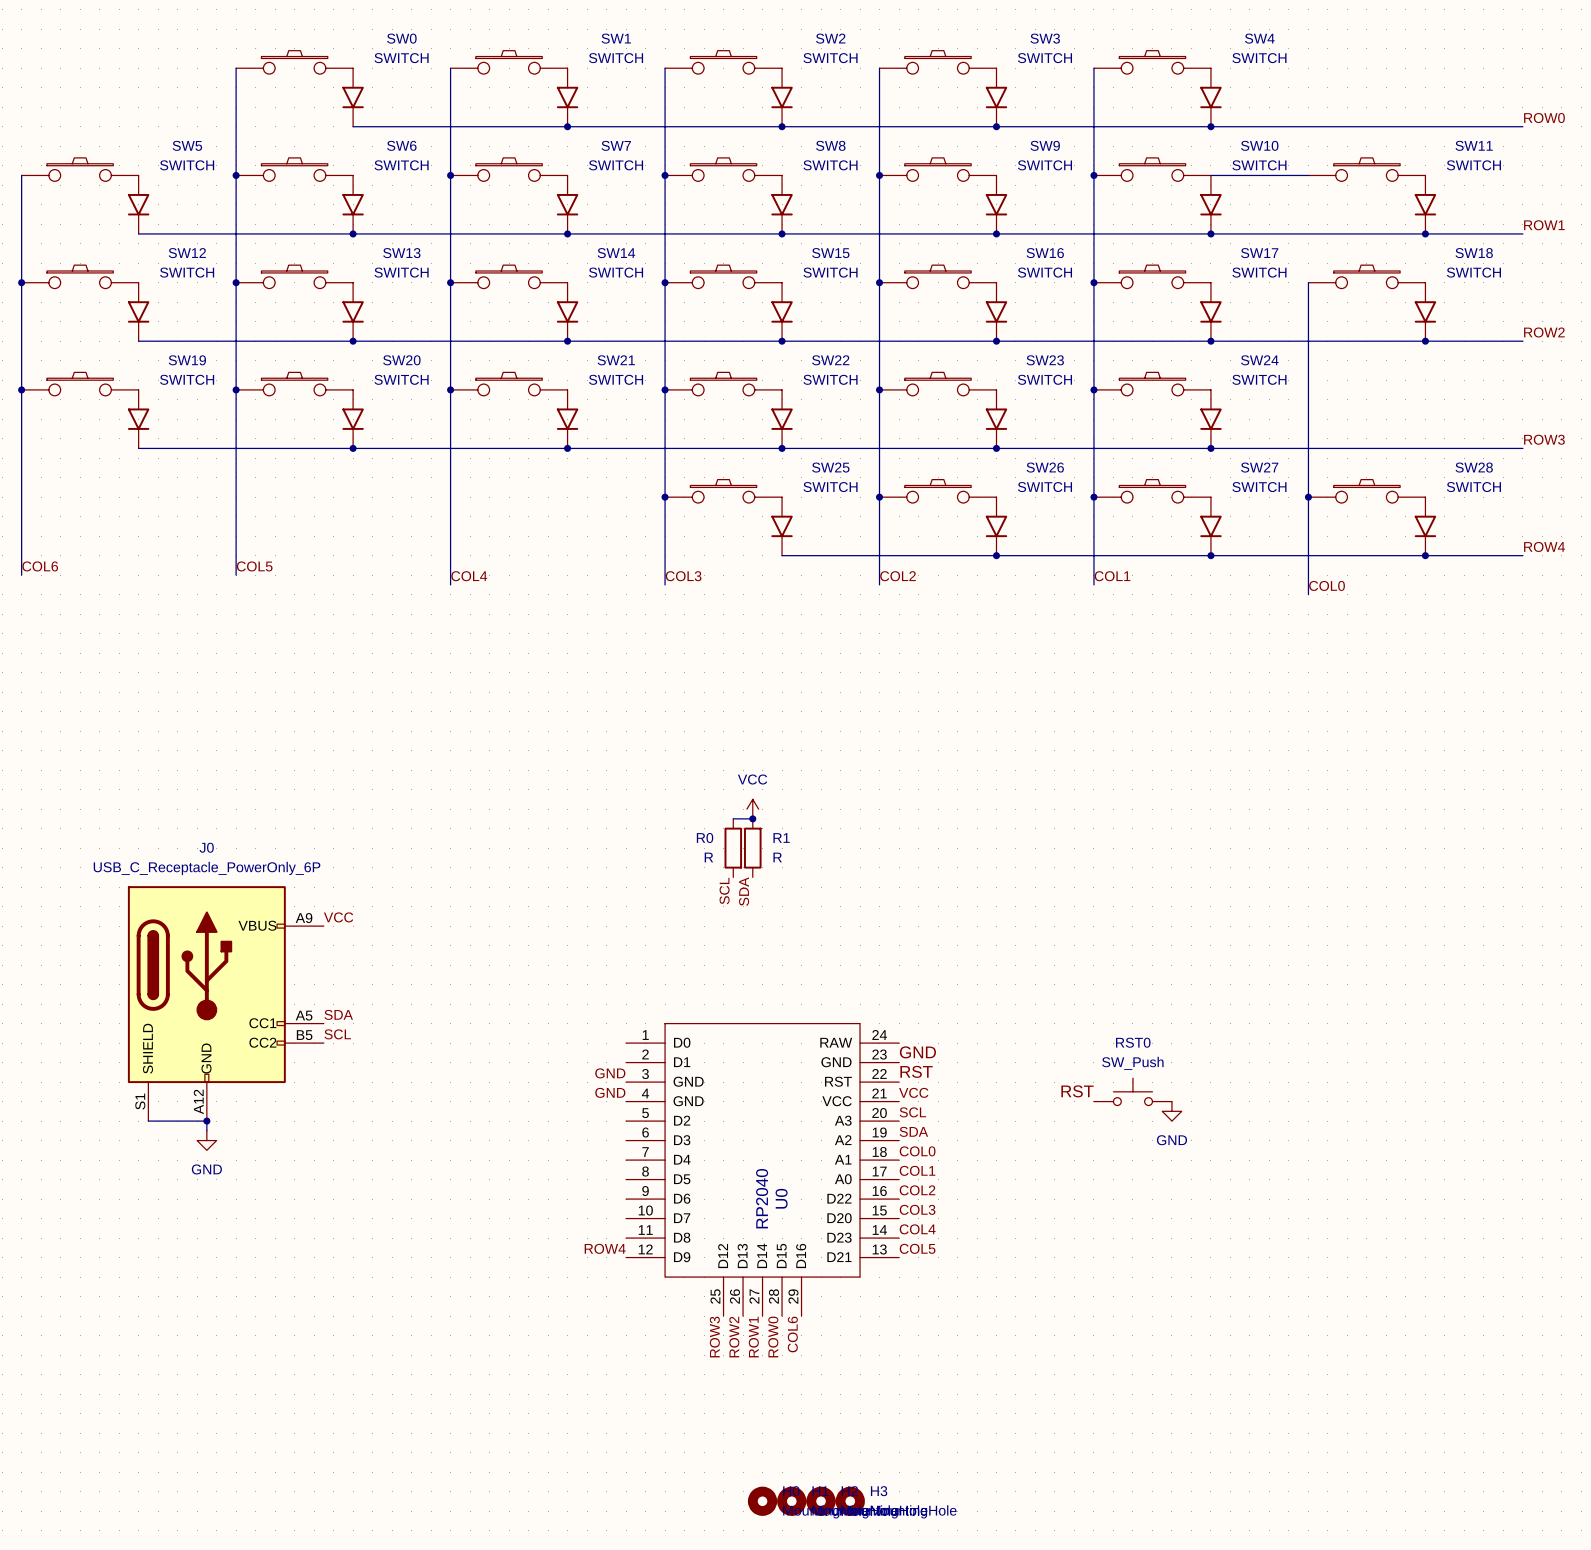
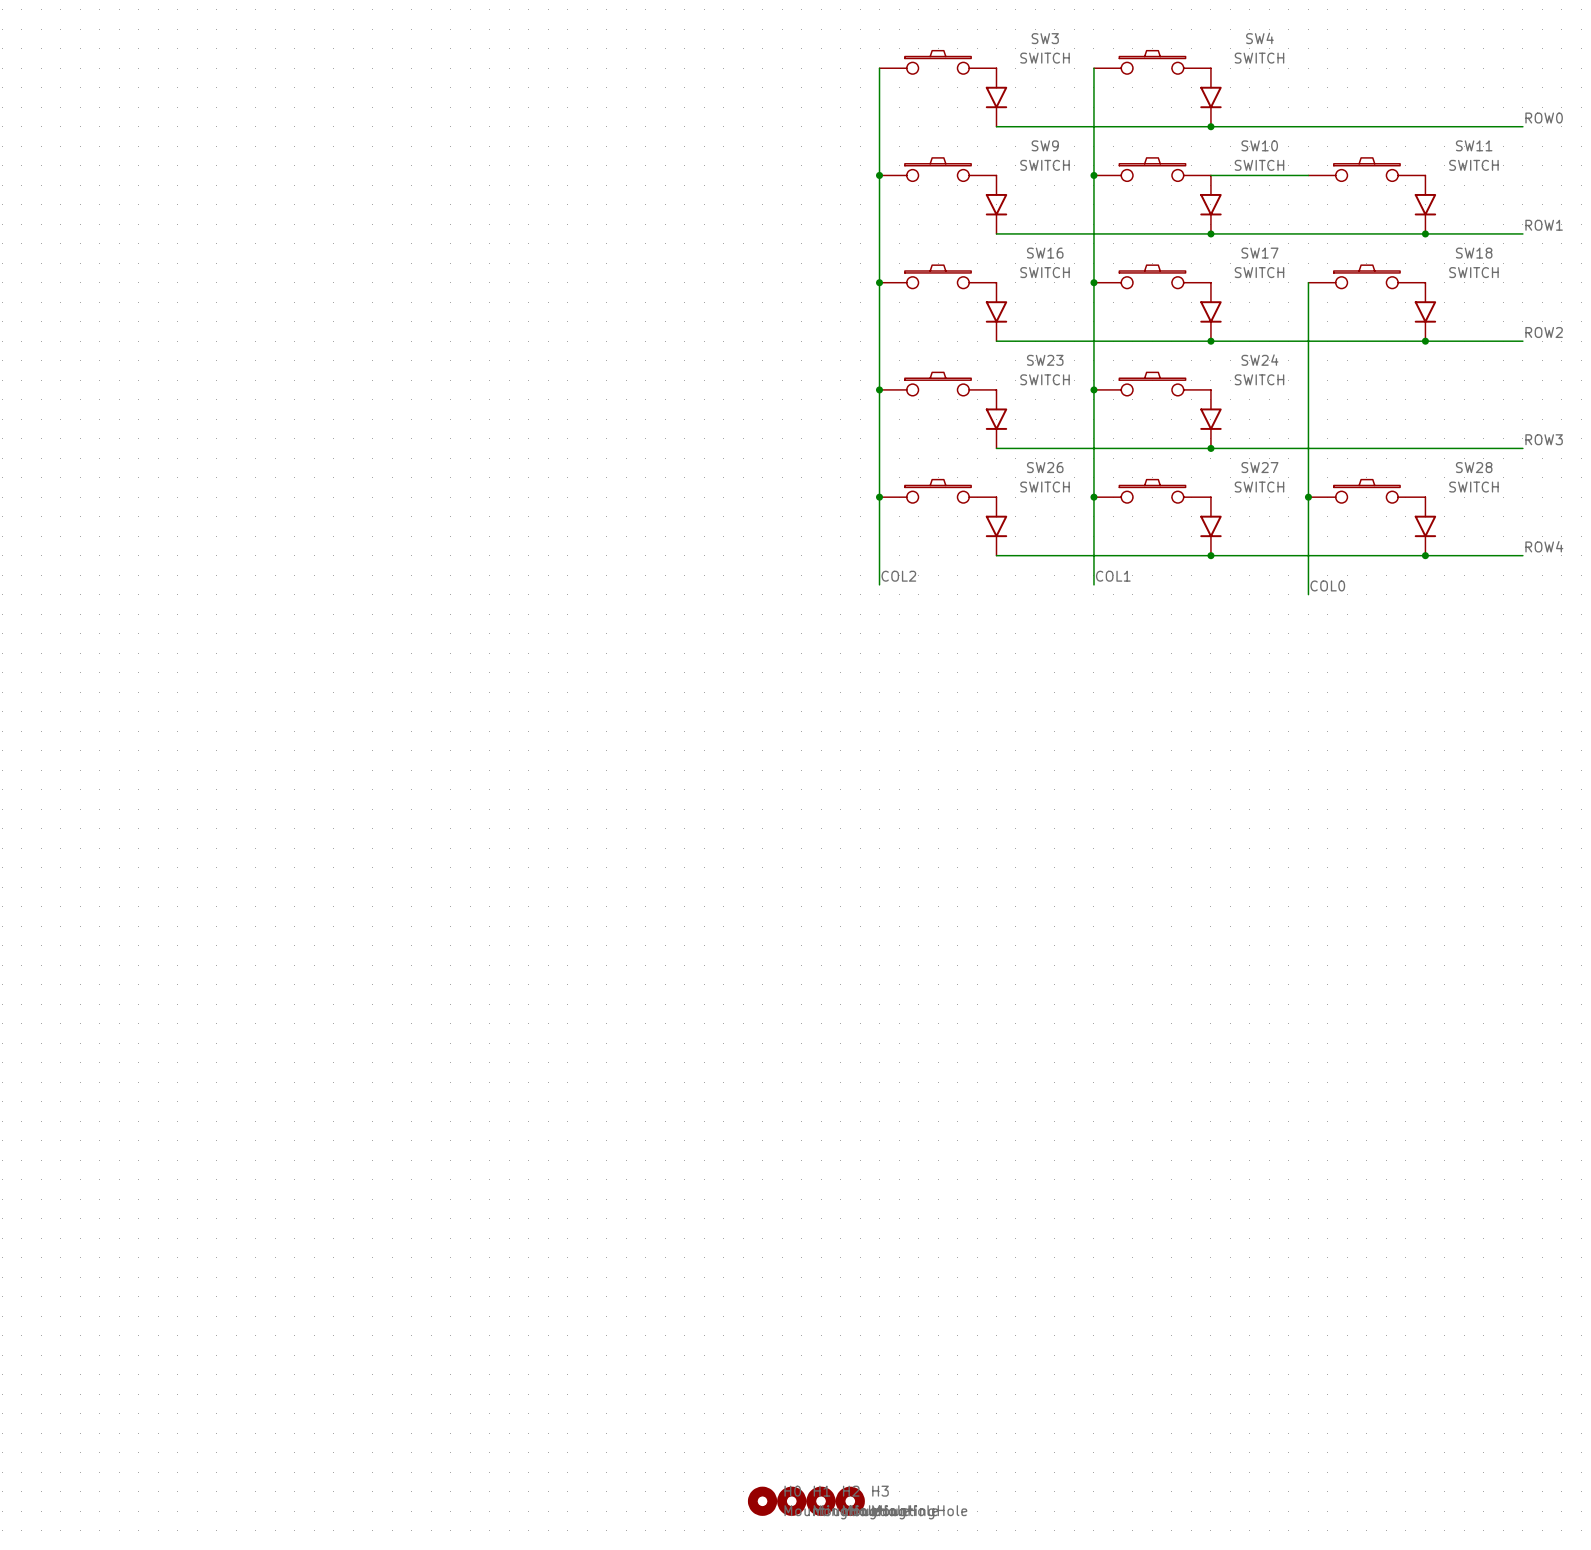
wire: (236, 68) (236, 575) -> none
wire: (450, 68) (450, 584) -> none
wire: (665, 68) (665, 584) -> none
SW0: SWITCH (299, 88) -> none
SW1: SWITCH (514, 88) -> none
SW2: SWITCH (728, 88) -> none
wire: (353, 126) (996, 126) -> none
junction: (567, 126) -> none
junction: (782, 126) -> none
junction: (996, 126) -> none
wire: (21, 175) (21, 575) -> none
junction: (236, 175) -> none
junction: (450, 175) -> none
junction: (665, 175) -> none
SW5: SWITCH (85, 195) -> none
SW6: SWITCH (299, 195) -> none
SW7: SWITCH (514, 195) -> none
SW8: SWITCH (728, 195) -> none
wire: (138, 233) (996, 233) -> none
junction: (353, 233) -> none
junction: (567, 233) -> none
junction: (782, 233) -> none
junction: (996, 233) -> none
junction: (21, 282) -> none
junction: (236, 282) -> none
junction: (450, 282) -> none
junction: (665, 282) -> none
SW12: SWITCH (85, 303) -> none
SW13: SWITCH (299, 303) -> none
SW14: SWITCH (514, 303) -> none
SW15: SWITCH (728, 303) -> none
wire: (138, 341) (996, 341) -> none
junction: (353, 341) -> none
junction: (567, 341) -> none
junction: (782, 341) -> none
junction: (996, 341) -> none
junction: (21, 389) -> none
junction: (236, 389) -> none
junction: (450, 389) -> none
junction: (665, 389) -> none
SW19: SWITCH (85, 410) -> none
SW20: SWITCH (299, 410) -> none
SW21: SWITCH (514, 410) -> none
SW22: SWITCH (728, 410) -> none
wire: (138, 448) (996, 448) -> none
junction: (353, 448) -> none
junction: (567, 448) -> none
junction: (782, 448) -> none
junction: (996, 448) -> none
junction: (665, 497) -> none
SW25: SWITCH (728, 517) -> none
wire: (782, 555) (996, 555) -> none
junction: (996, 555) -> none
label: COL6 (40, 566) -> none
label: COL5 (254, 566) -> none
label: COL4 (469, 576) -> none
label: COL3 (683, 576) -> none
power symbol: VCC (752, 809) -> none
wire: (733, 818) (752, 818) -> none
junction: (752, 818) -> none
R0: R (733, 848) -> none
R1: R (752, 848) -> none
label: SCL (724, 891) -> none
label: SDA (744, 891) -> none
label: VCC (338, 917) -> none
J0: USB_C_Receptacle_PowerOnly_6P (225, 1003) -> none
label: SDA (338, 1014) -> none
label: SCL (337, 1034) -> none
label: GND (917, 1052) -> none
label: RST (916, 1071) -> none
label: GND (610, 1073) -> none
label: RST (1077, 1091) -> none
RST0: SW_Push (1132, 1091) -> none
label: GND (610, 1092) -> none
label: VCC (913, 1092) -> none
power symbol: GND (1171, 1111) -> none
label: SCL (912, 1112) -> none
wire: (148, 1121) (206, 1121) (206, 1130) -> none
junction: (206, 1121) -> none
label: SDA (913, 1131) -> none
power symbol: GND (206, 1140) -> none
label: COL0 (917, 1151) -> none
U0: RP2040 (762, 1169) -> none
label: COL1 (917, 1170) -> none
label: COL2 (917, 1190) -> none
label: COL3 (917, 1209) -> none
label: COL4 (917, 1229) -> none
label: ROW4 (605, 1248) -> none
label: COL5 (917, 1248) -> none
label: COL6 (792, 1334) -> none
label: ROW3 (714, 1337) -> none
label: ROW2 (734, 1337) -> none
label: ROW1 (753, 1337) -> none
label: ROW0 (773, 1337) -> none

